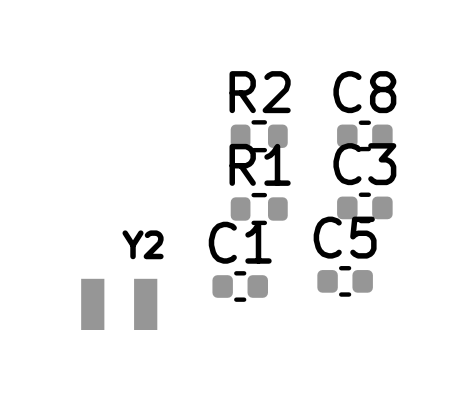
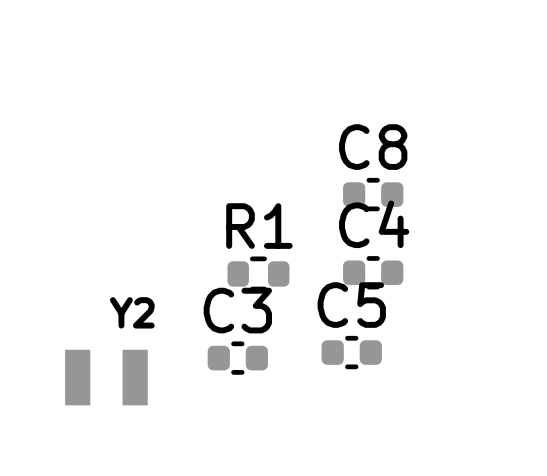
R2: (259, 136) -> none
C3 name: C3 (364, 164) -> C4 (374, 224)
C1 name: C1 (240, 242) -> C3 (237, 310)

